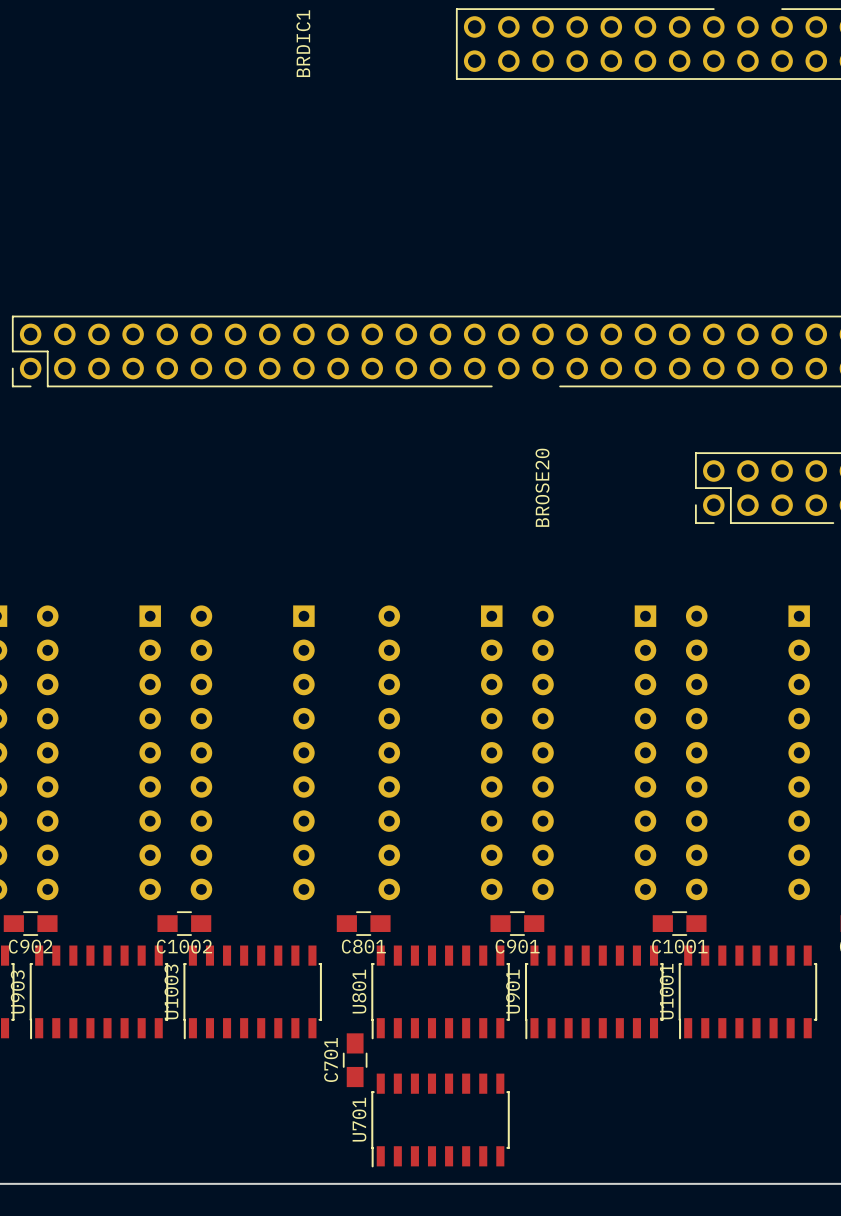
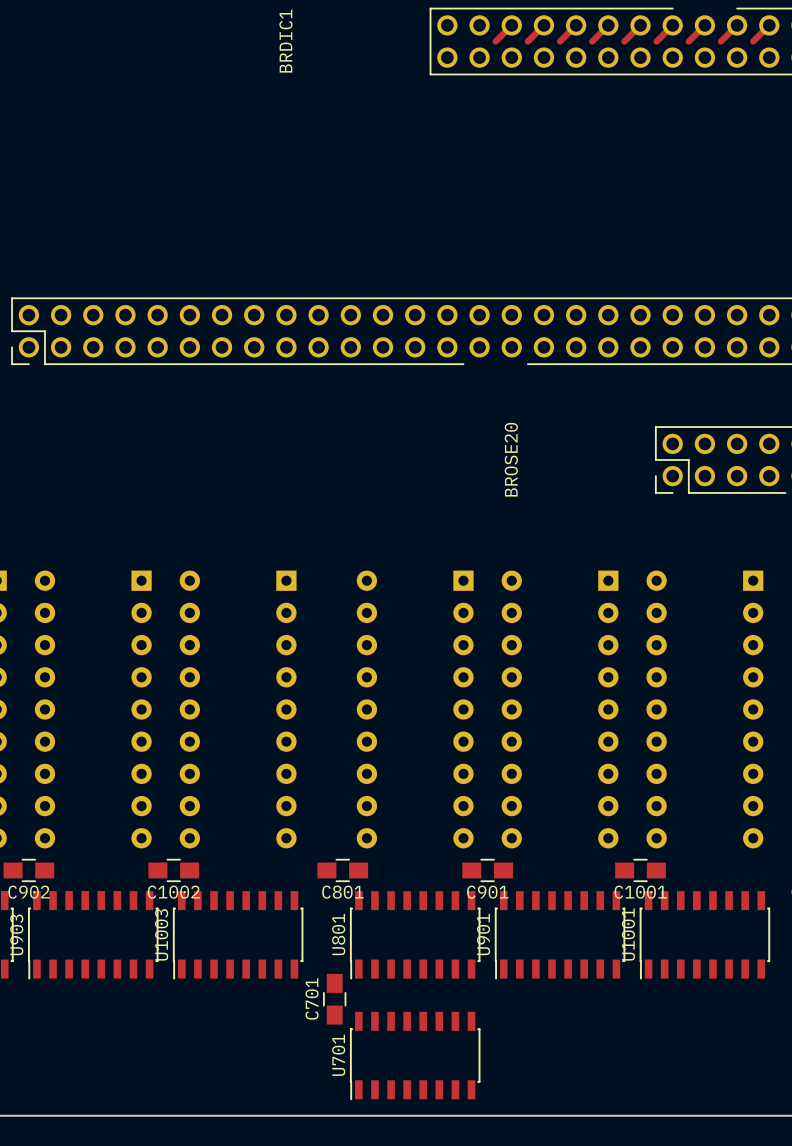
track: none -> (511, 25) (495, 41)
track: none -> (543, 25) (527, 41)
track: none -> (576, 25) (560, 41)
track: none -> (608, 25) (592, 41)
track: none -> (640, 25) (624, 41)
track: none -> (672, 25) (656, 41)
track: none -> (704, 25) (688, 41)
track: none -> (737, 25) (721, 41)
track: none -> (769, 25) (753, 41)

